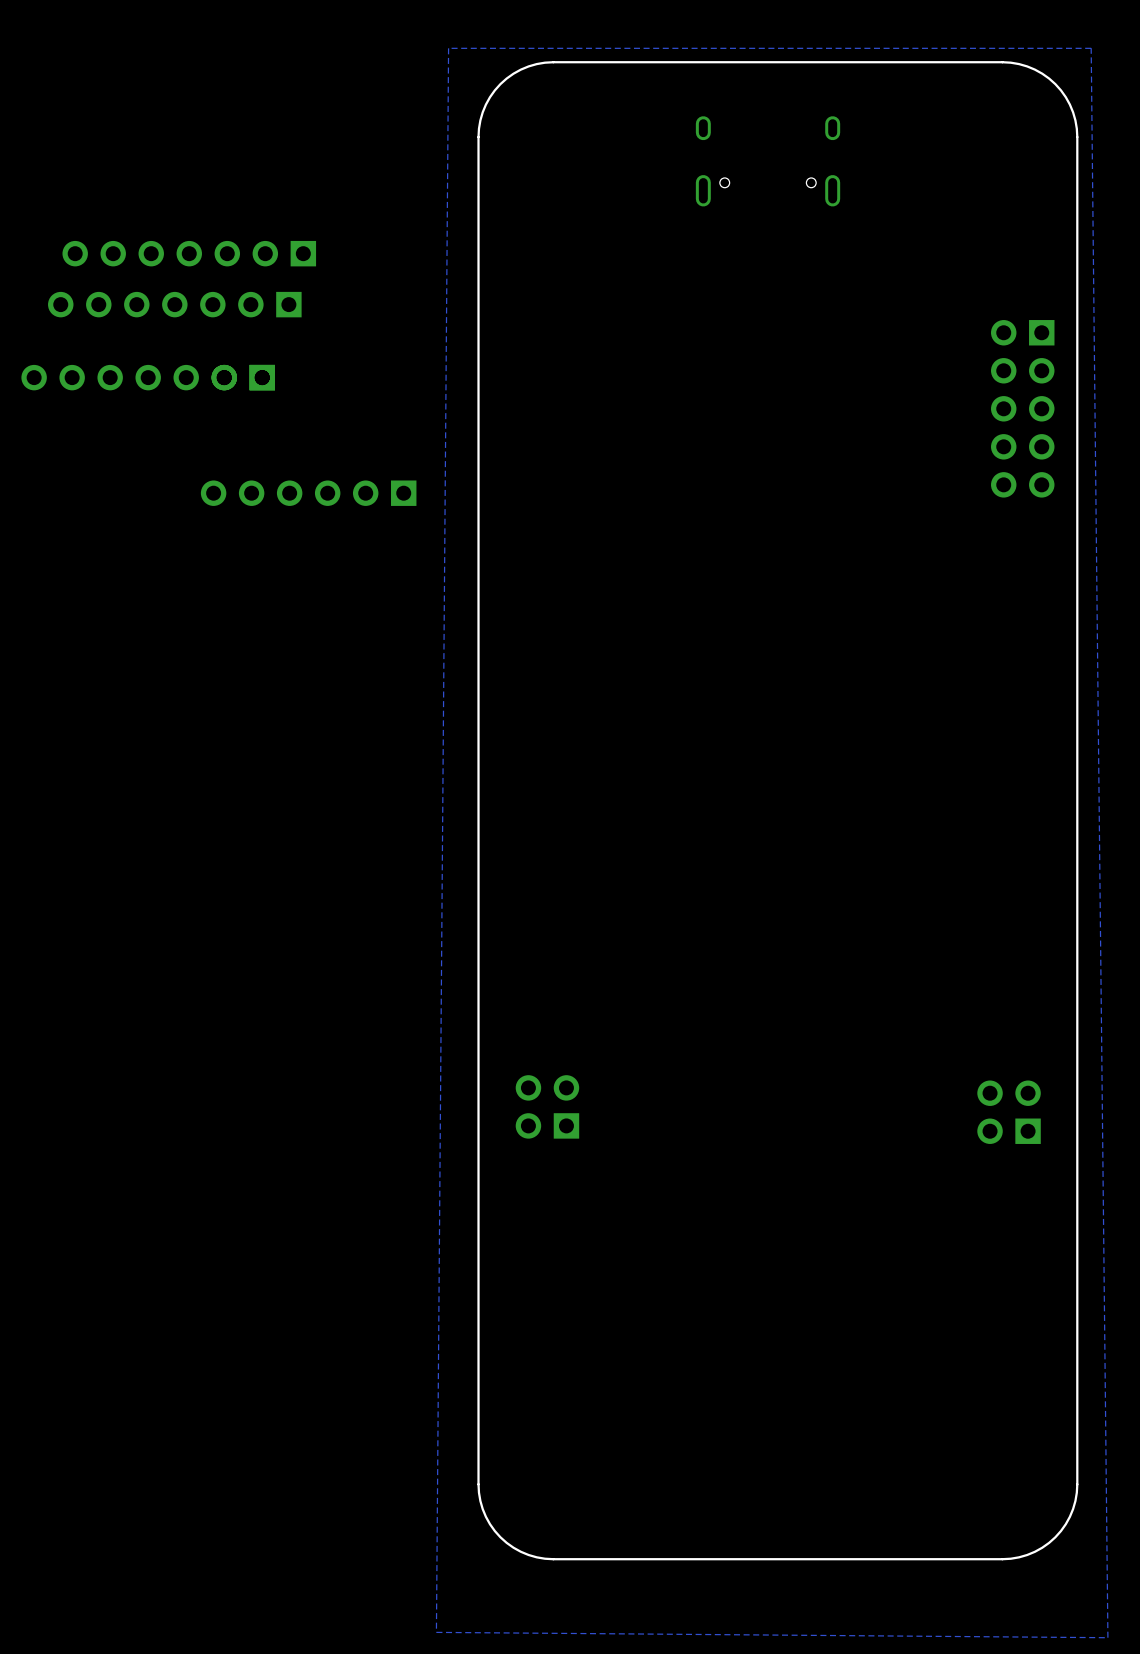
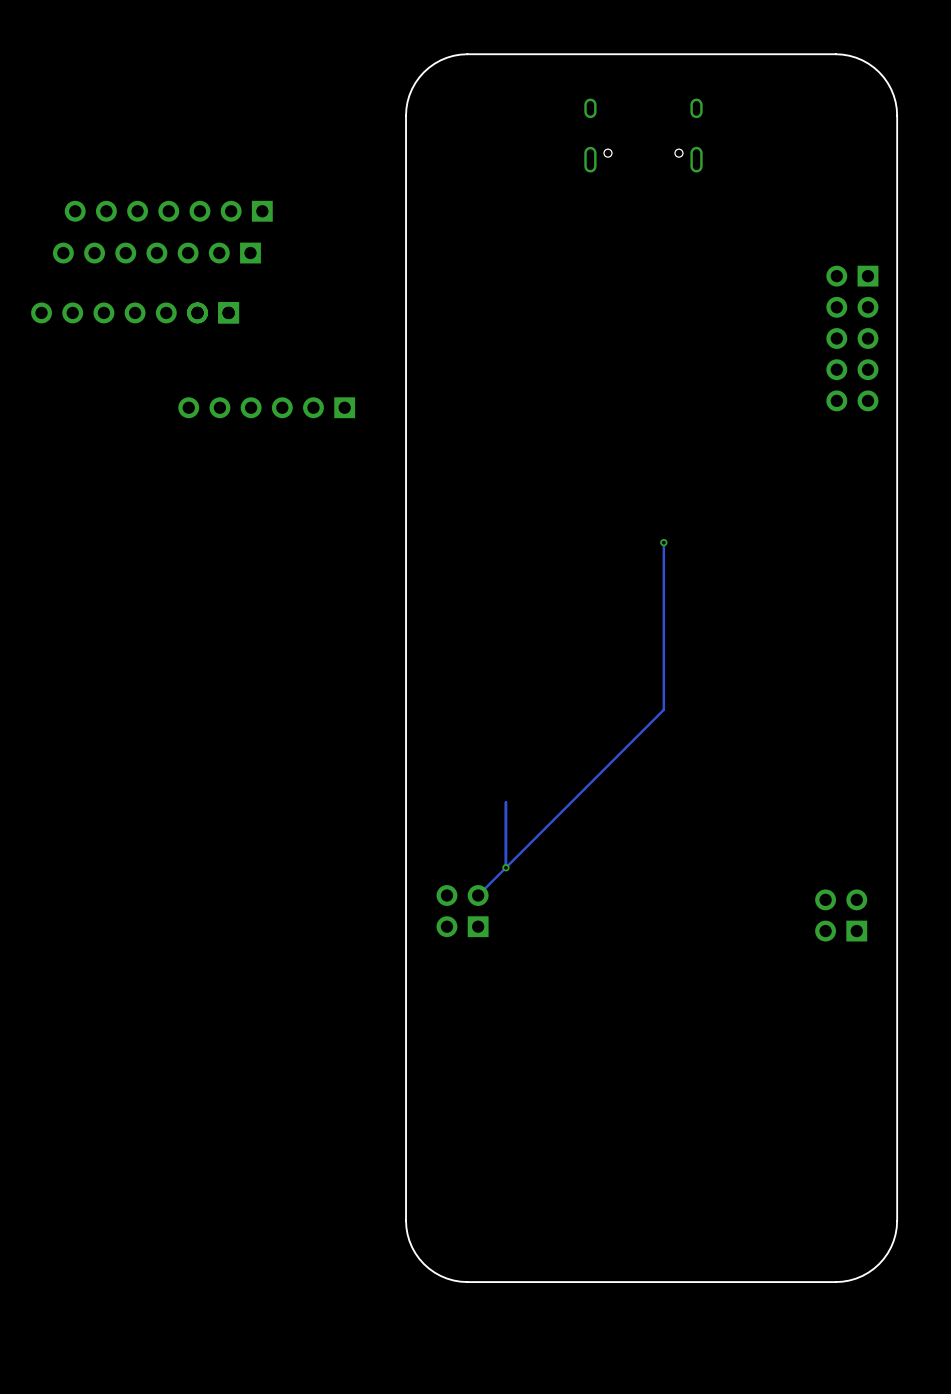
zone outline: (1091, 48) (1107, 1637) (436, 1632) (448, 48) (1091, 48) -> none
track: none -> (663, 542) (663, 709) (478, 895)
via: none -> (663, 542)
track: none -> (505, 802) (505, 867)
via: none -> (505, 867)

